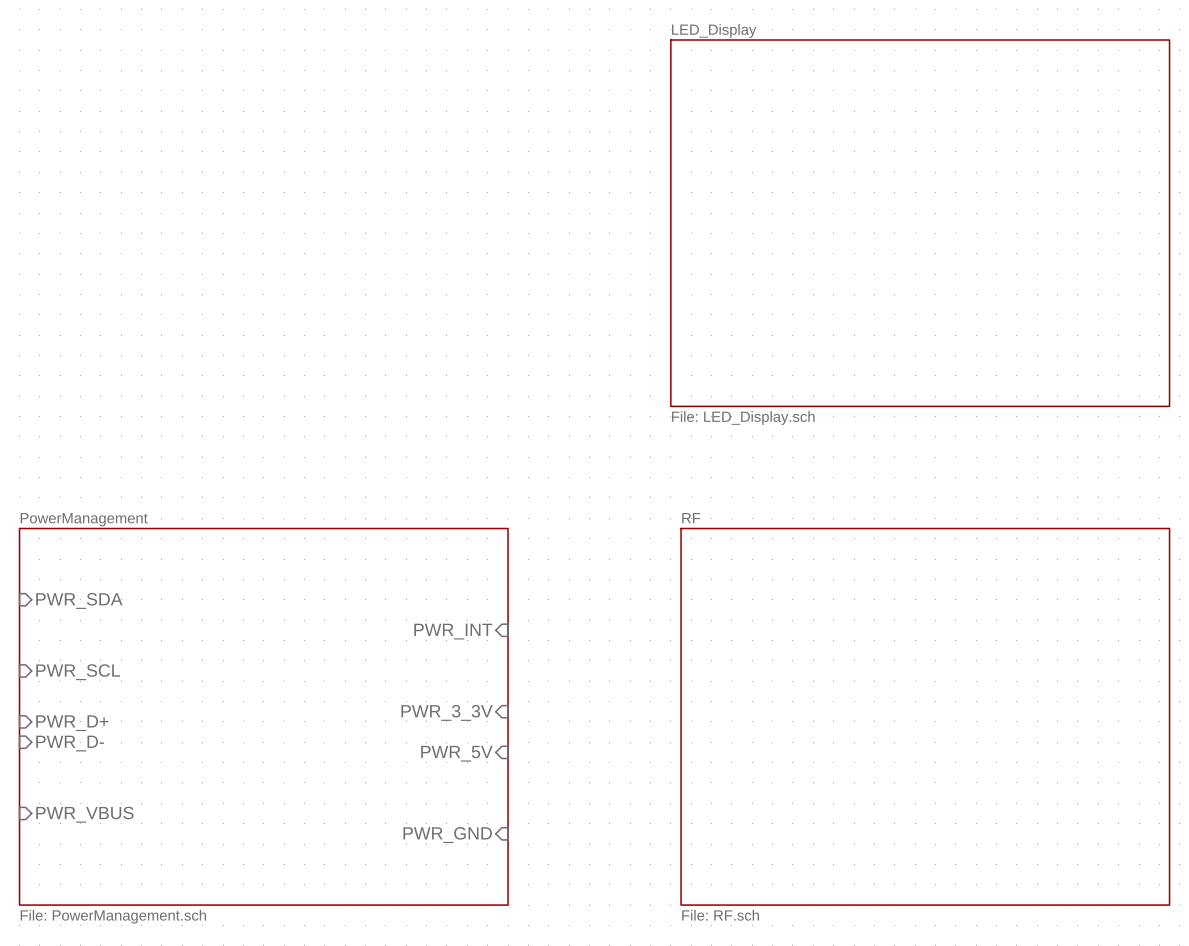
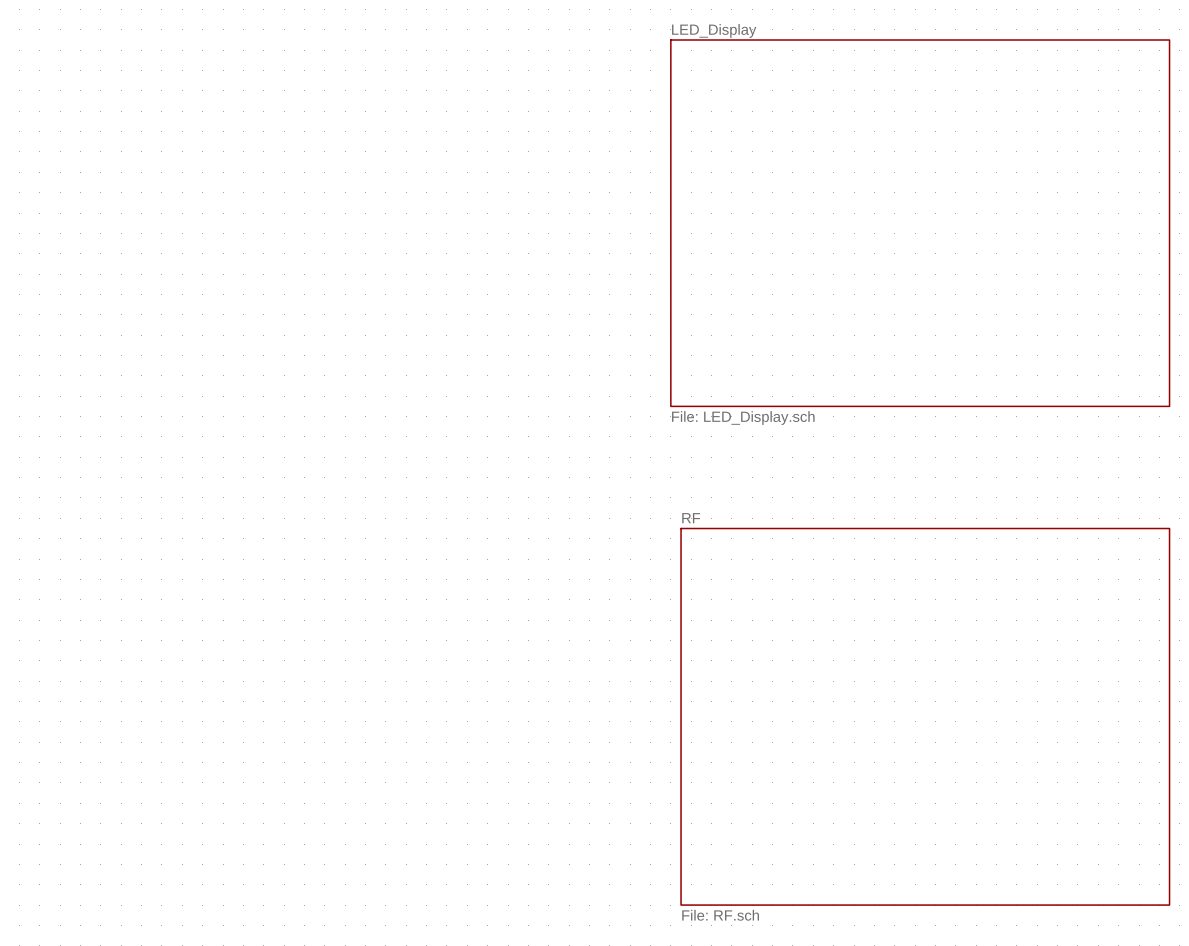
sheet pin: PWR_SDA (79, 600) -> none
sheet pin: PWR_INT (453, 631) -> none
sheet pin: PWR_SCL (78, 672) -> none
sheet pin: PWR_3_3V (447, 712) -> none
sheet PowerManagement: File: PowerManagement.sch (263, 716) -> none
sheet pin: PWR_D+ (72, 723) -> none
sheet pin: PWR_D- (70, 743) -> none
sheet pin: PWR_5V (456, 753) -> none
sheet pin: PWR_VBUS (84, 814) -> none
sheet pin: PWR_GND (447, 835) -> none

